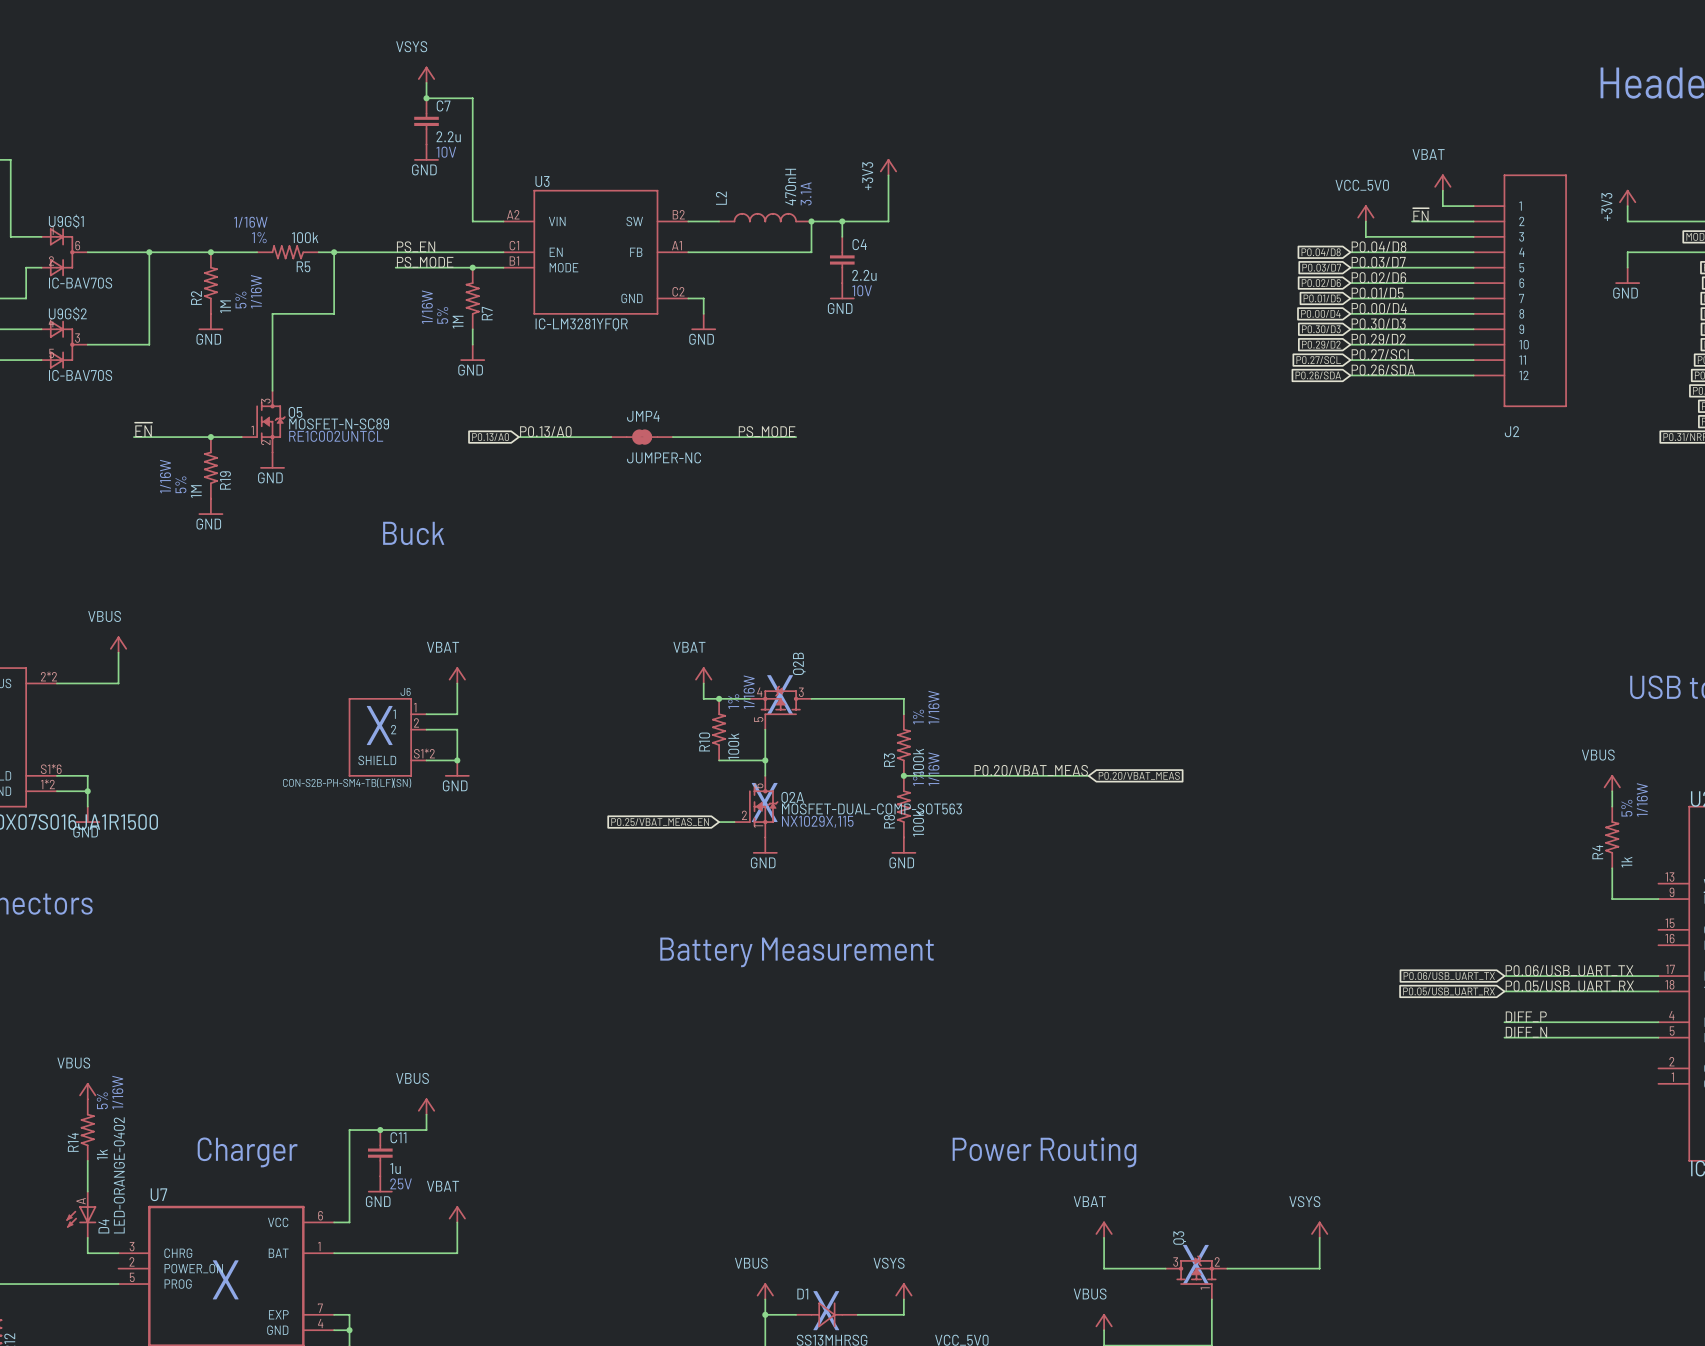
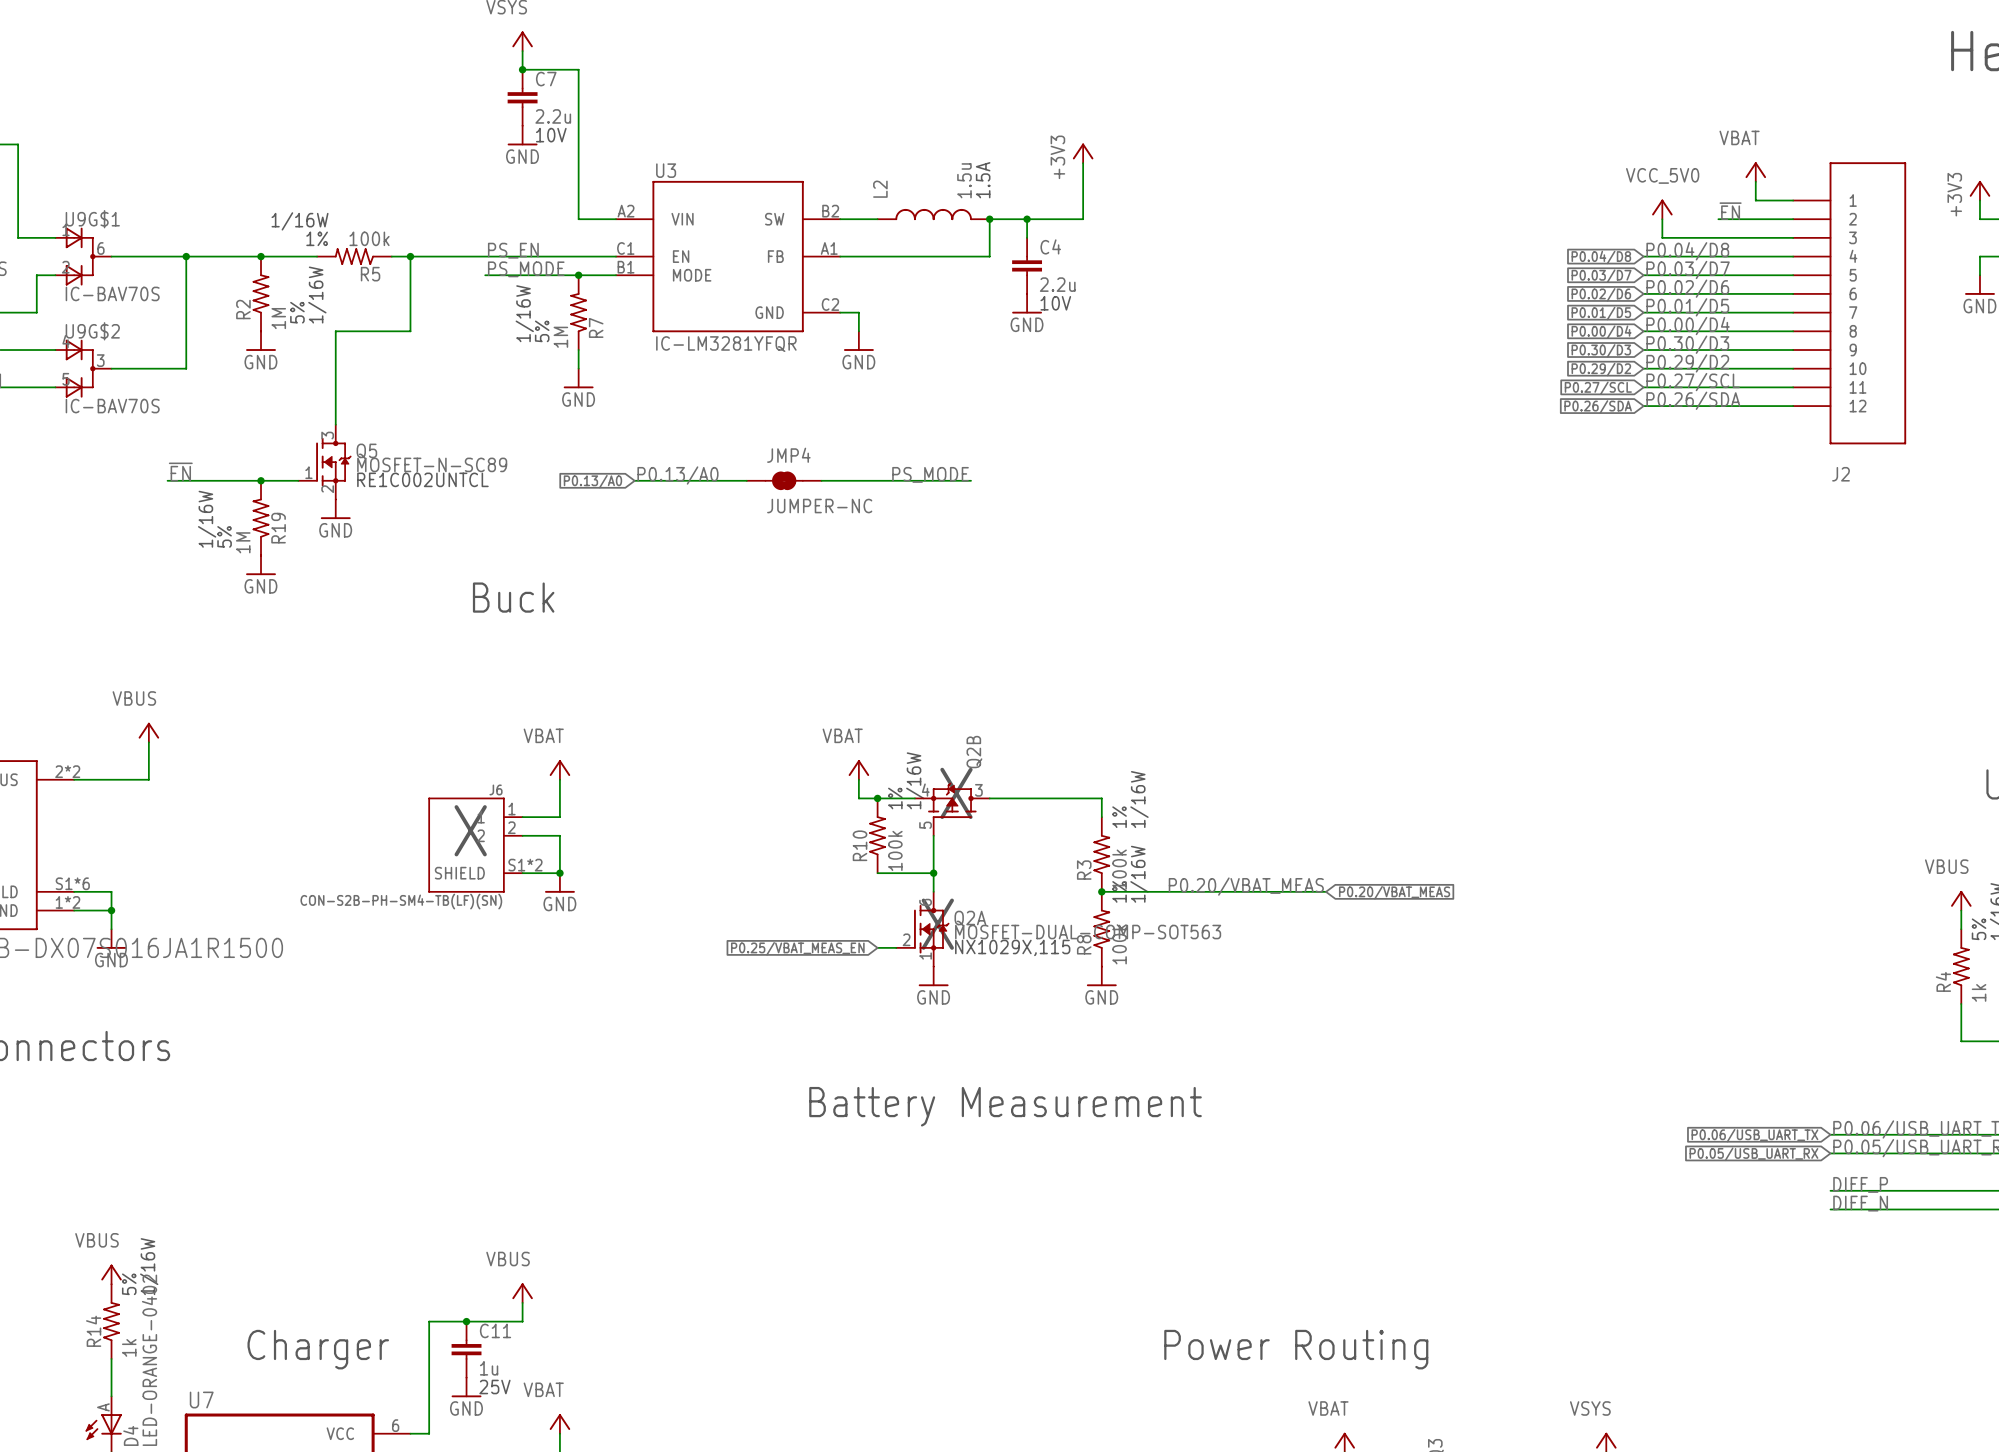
L2 value: 470nH (790, 187) -> 1.5u (964, 180)
L2 text: 3.1A (806, 193) -> 1.5A (983, 180)

